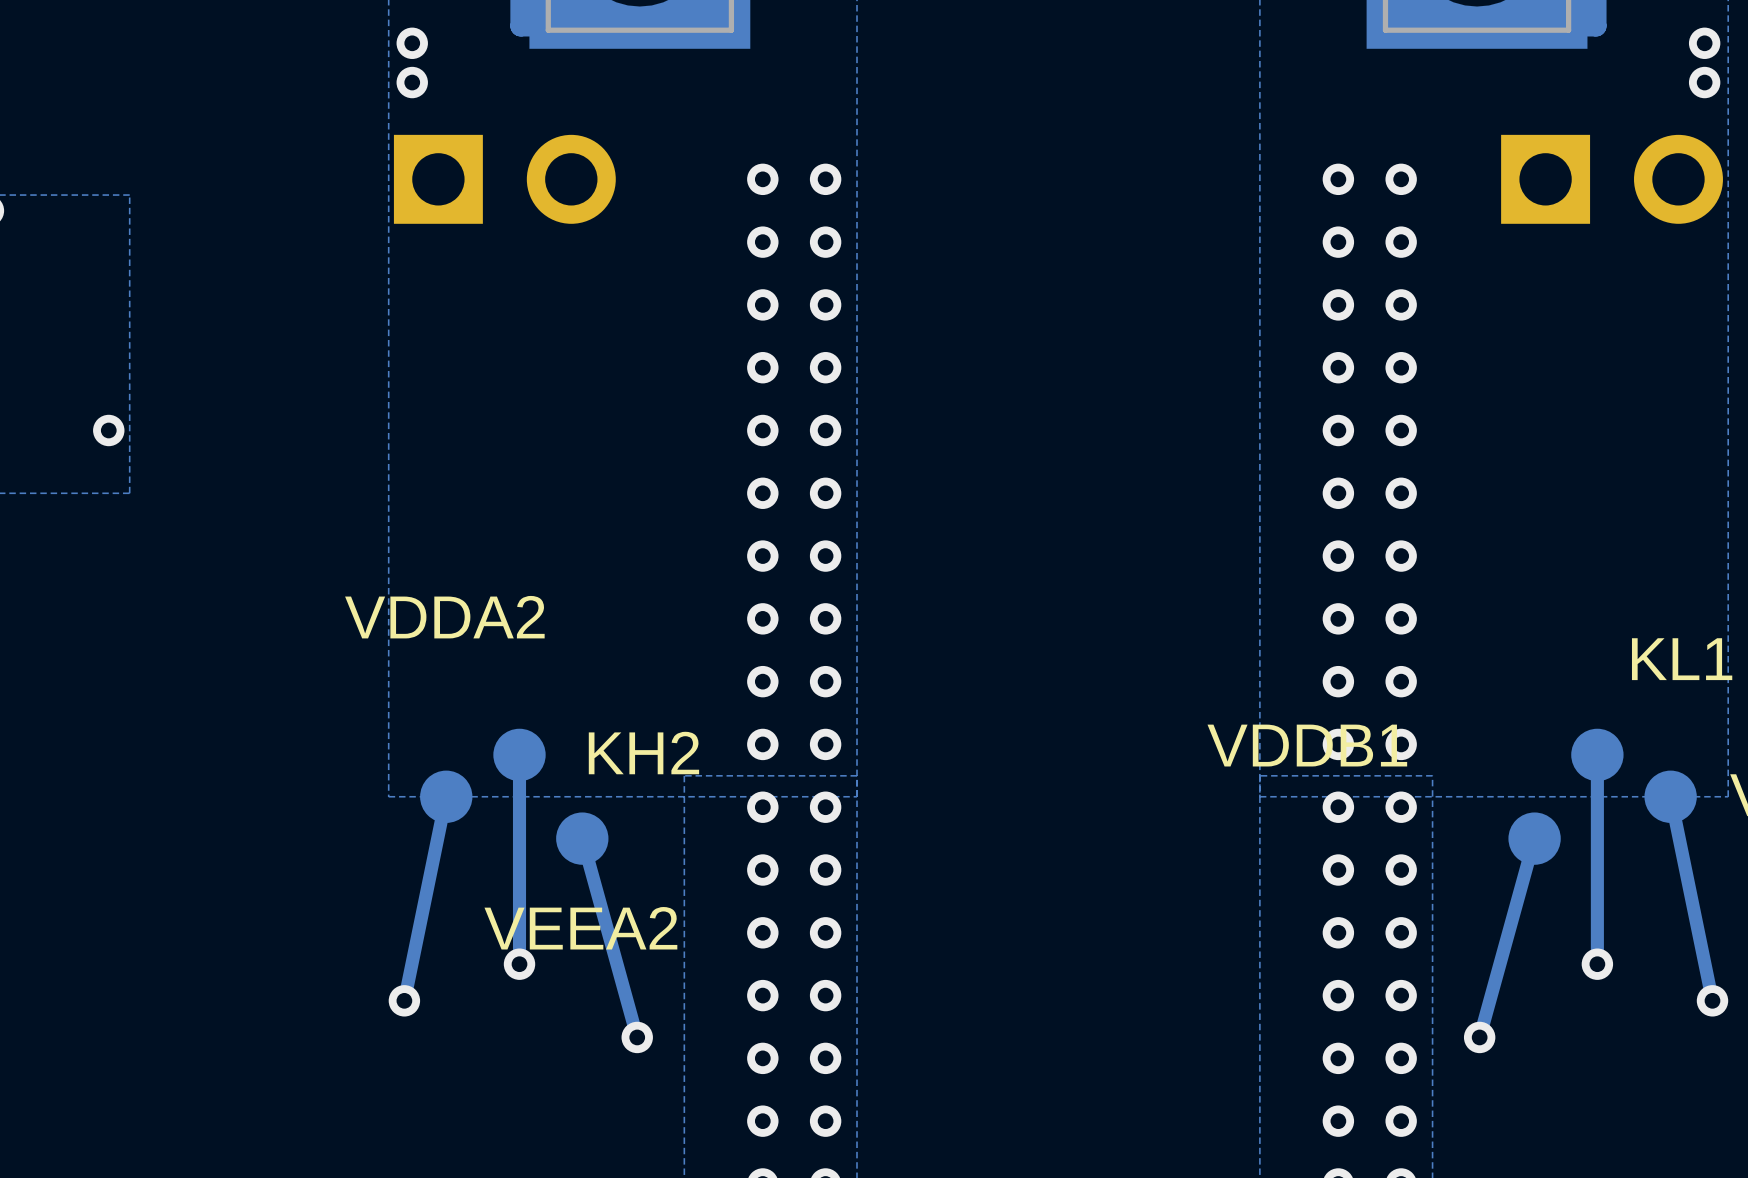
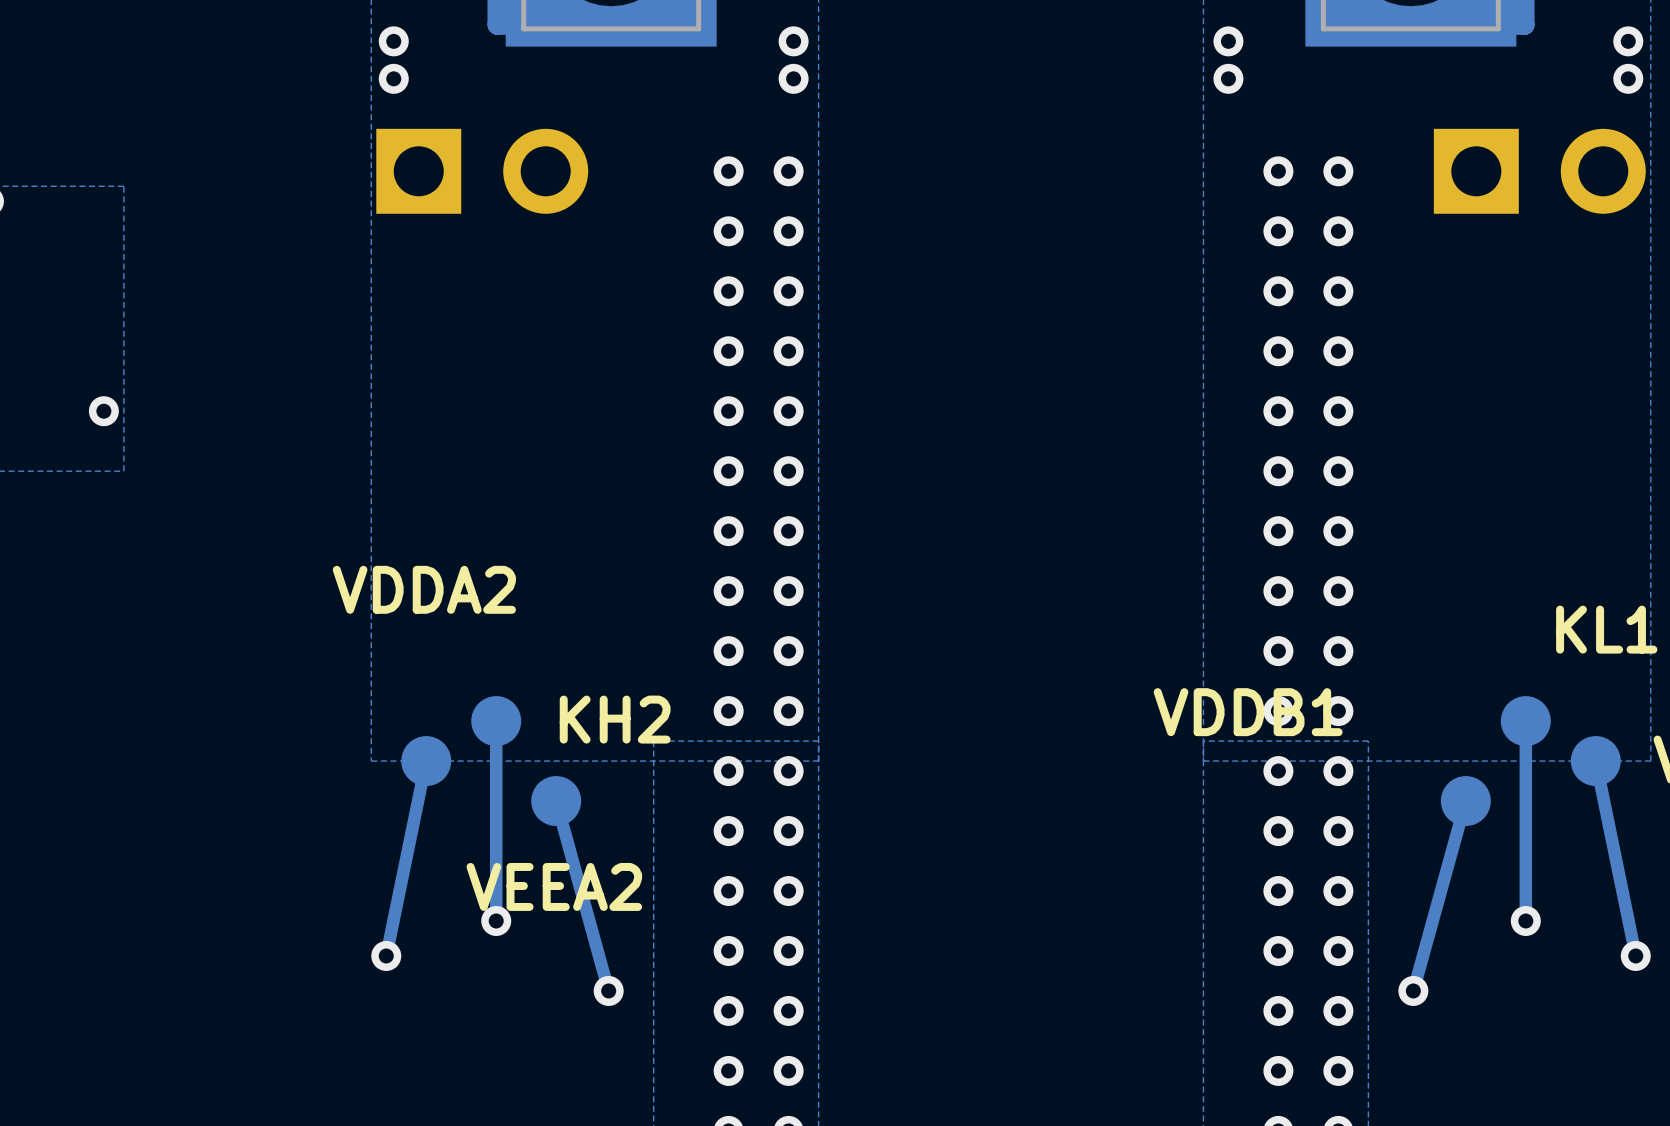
via: none -> (793, 41)
via: none -> (1228, 41)
via: none -> (793, 78)
via: none -> (1228, 78)

